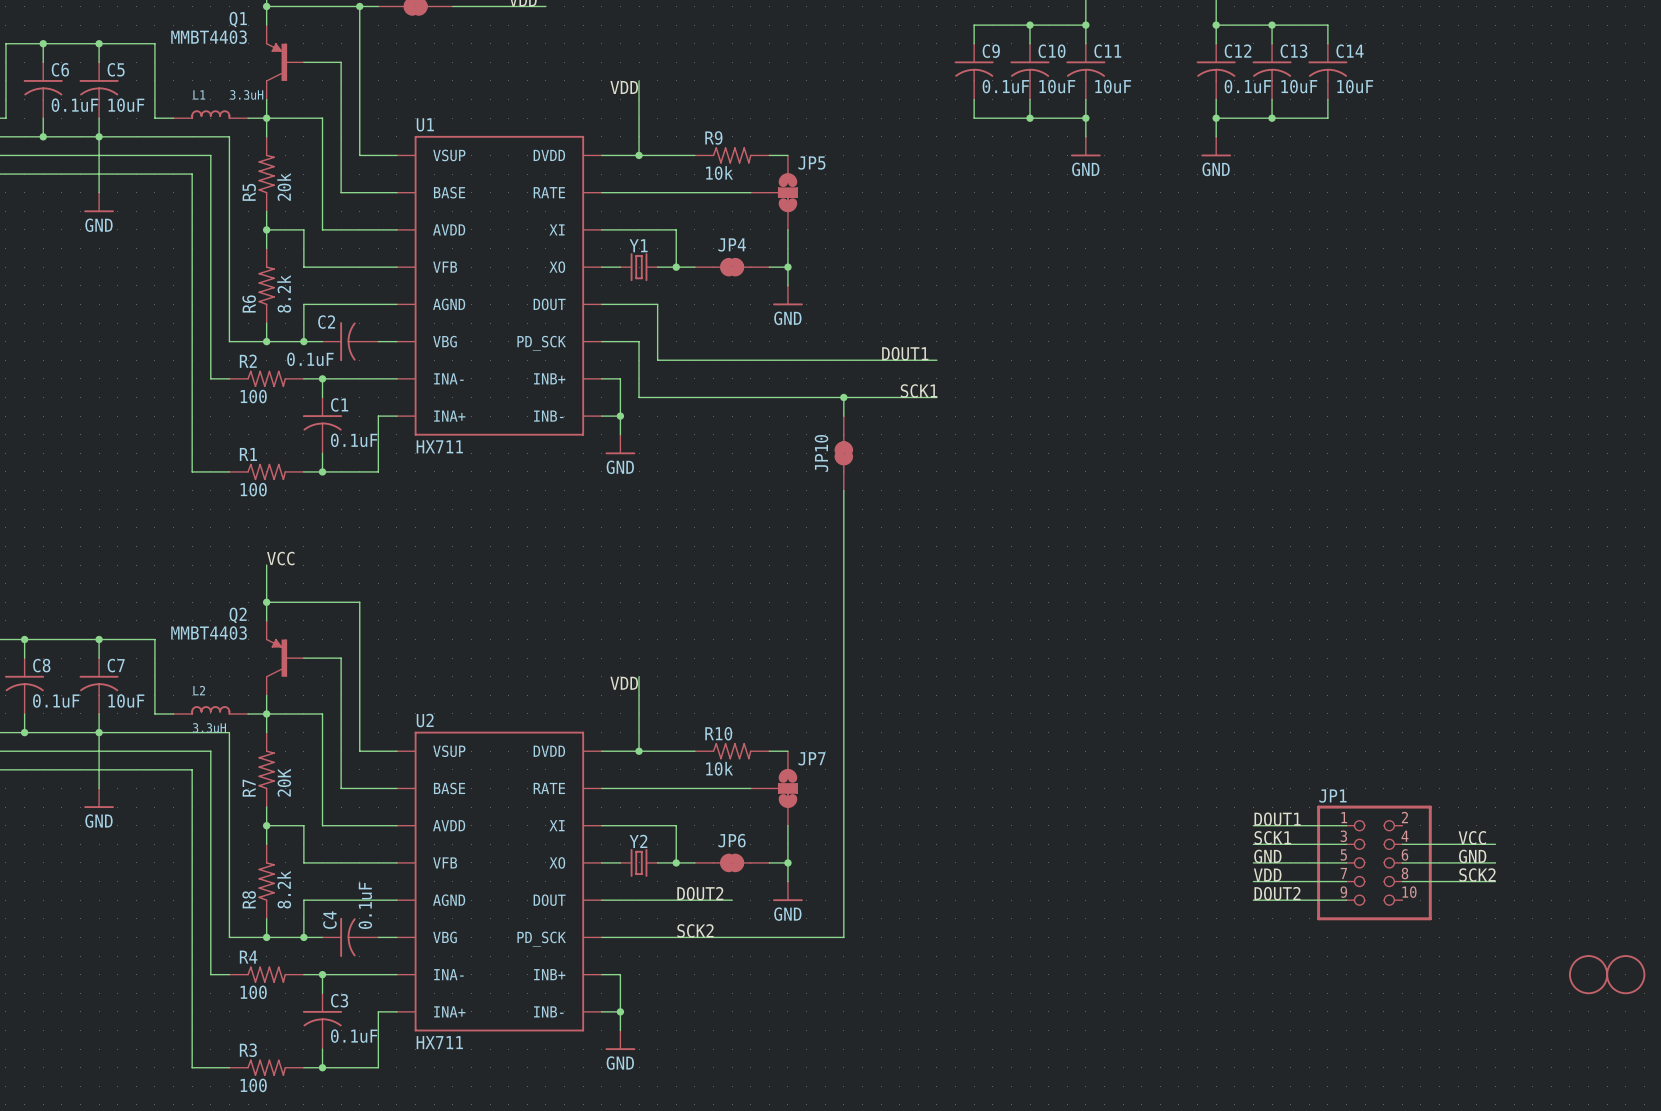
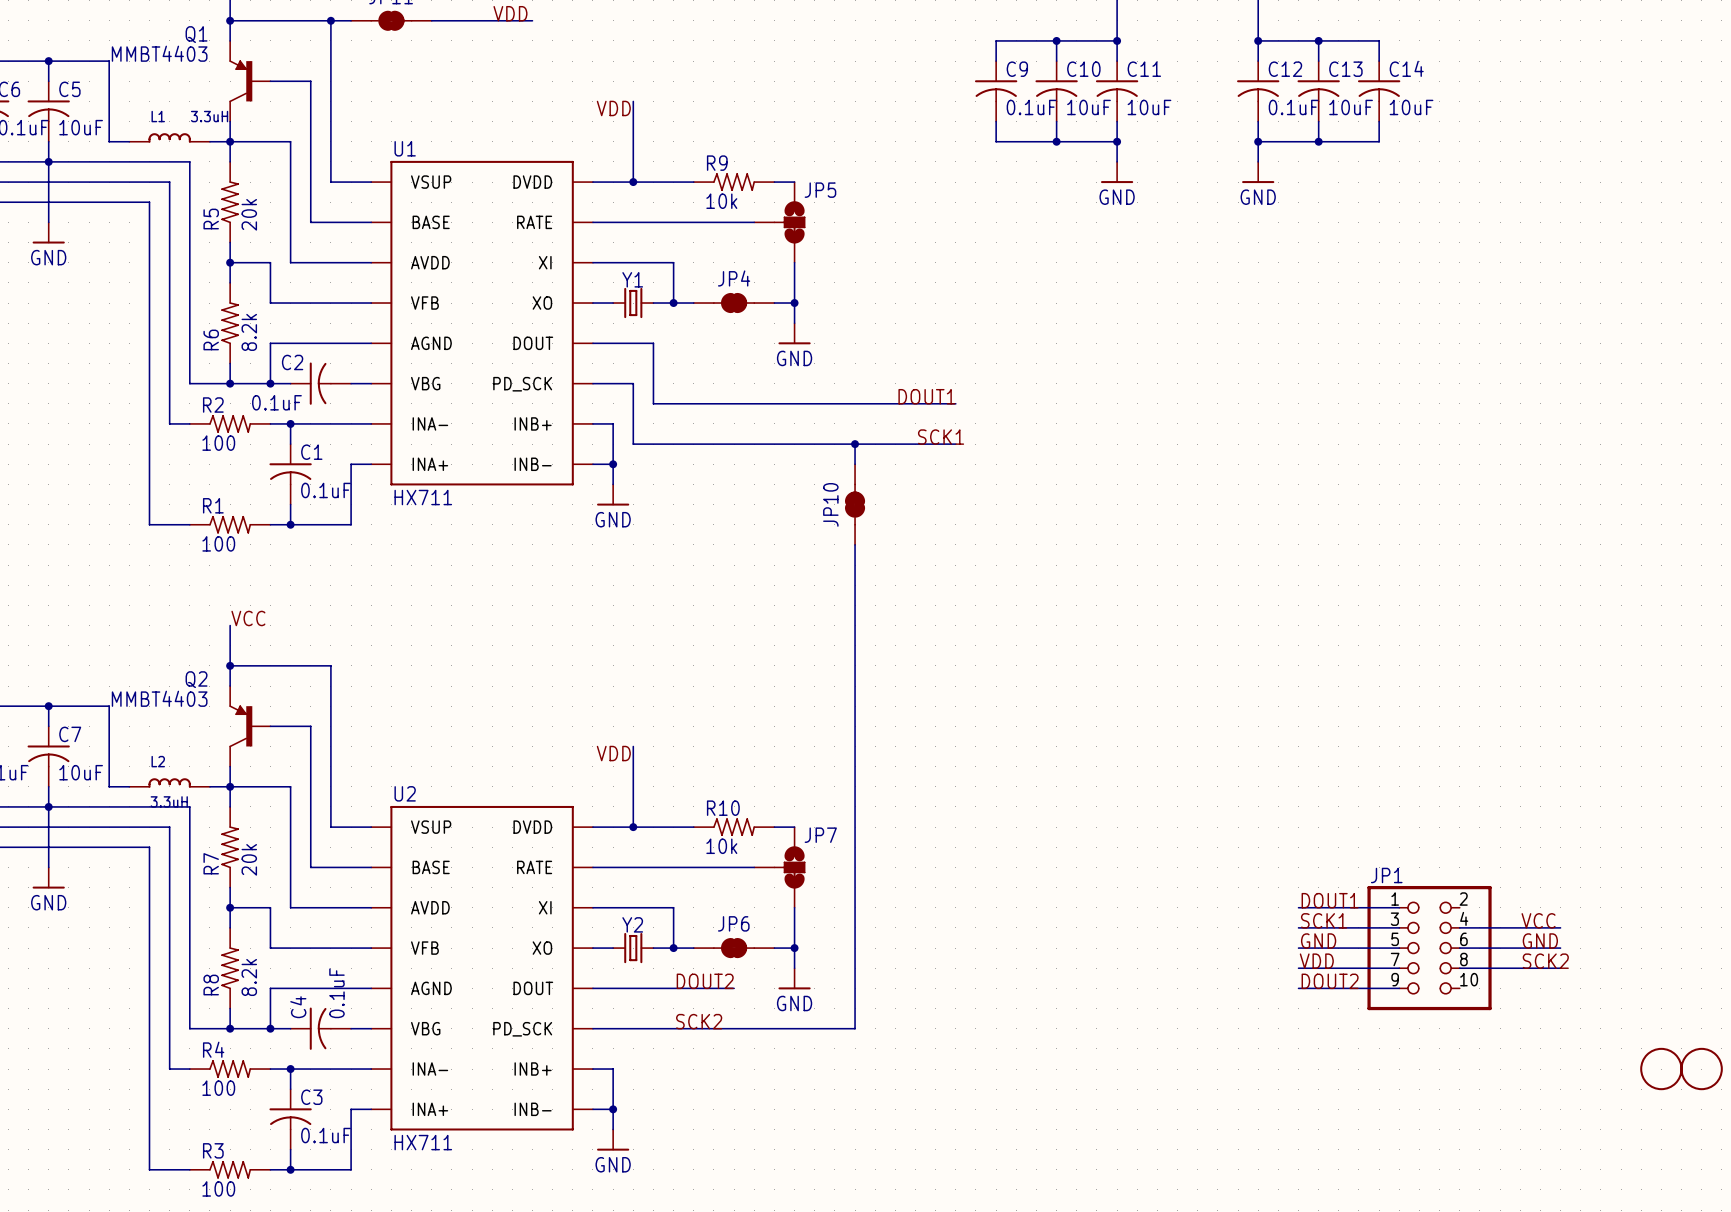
R7 value: 20K (284, 782) -> 20k (249, 859)

